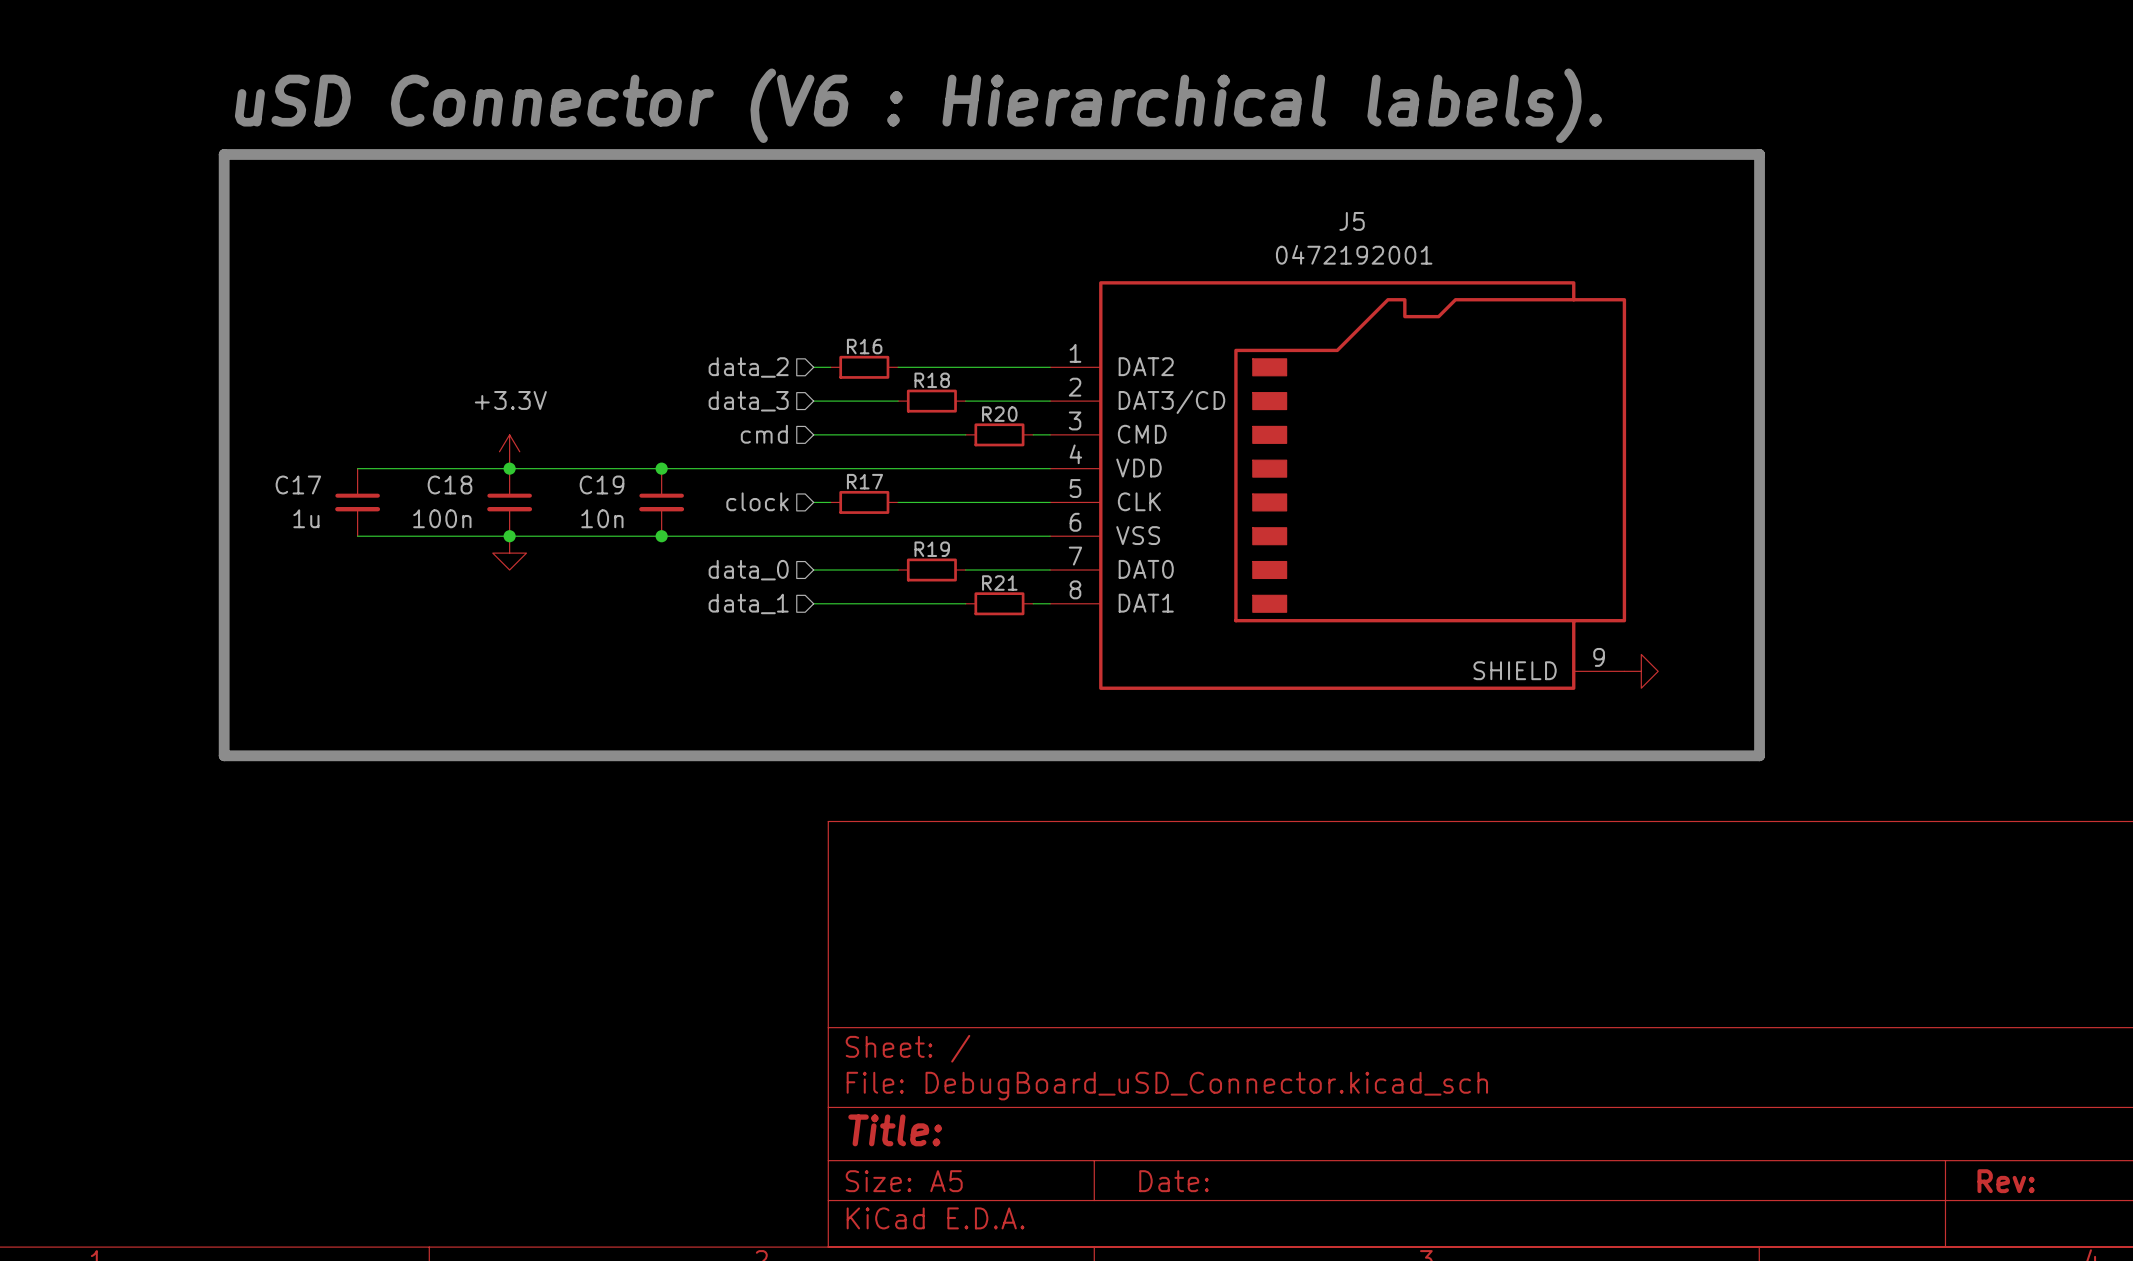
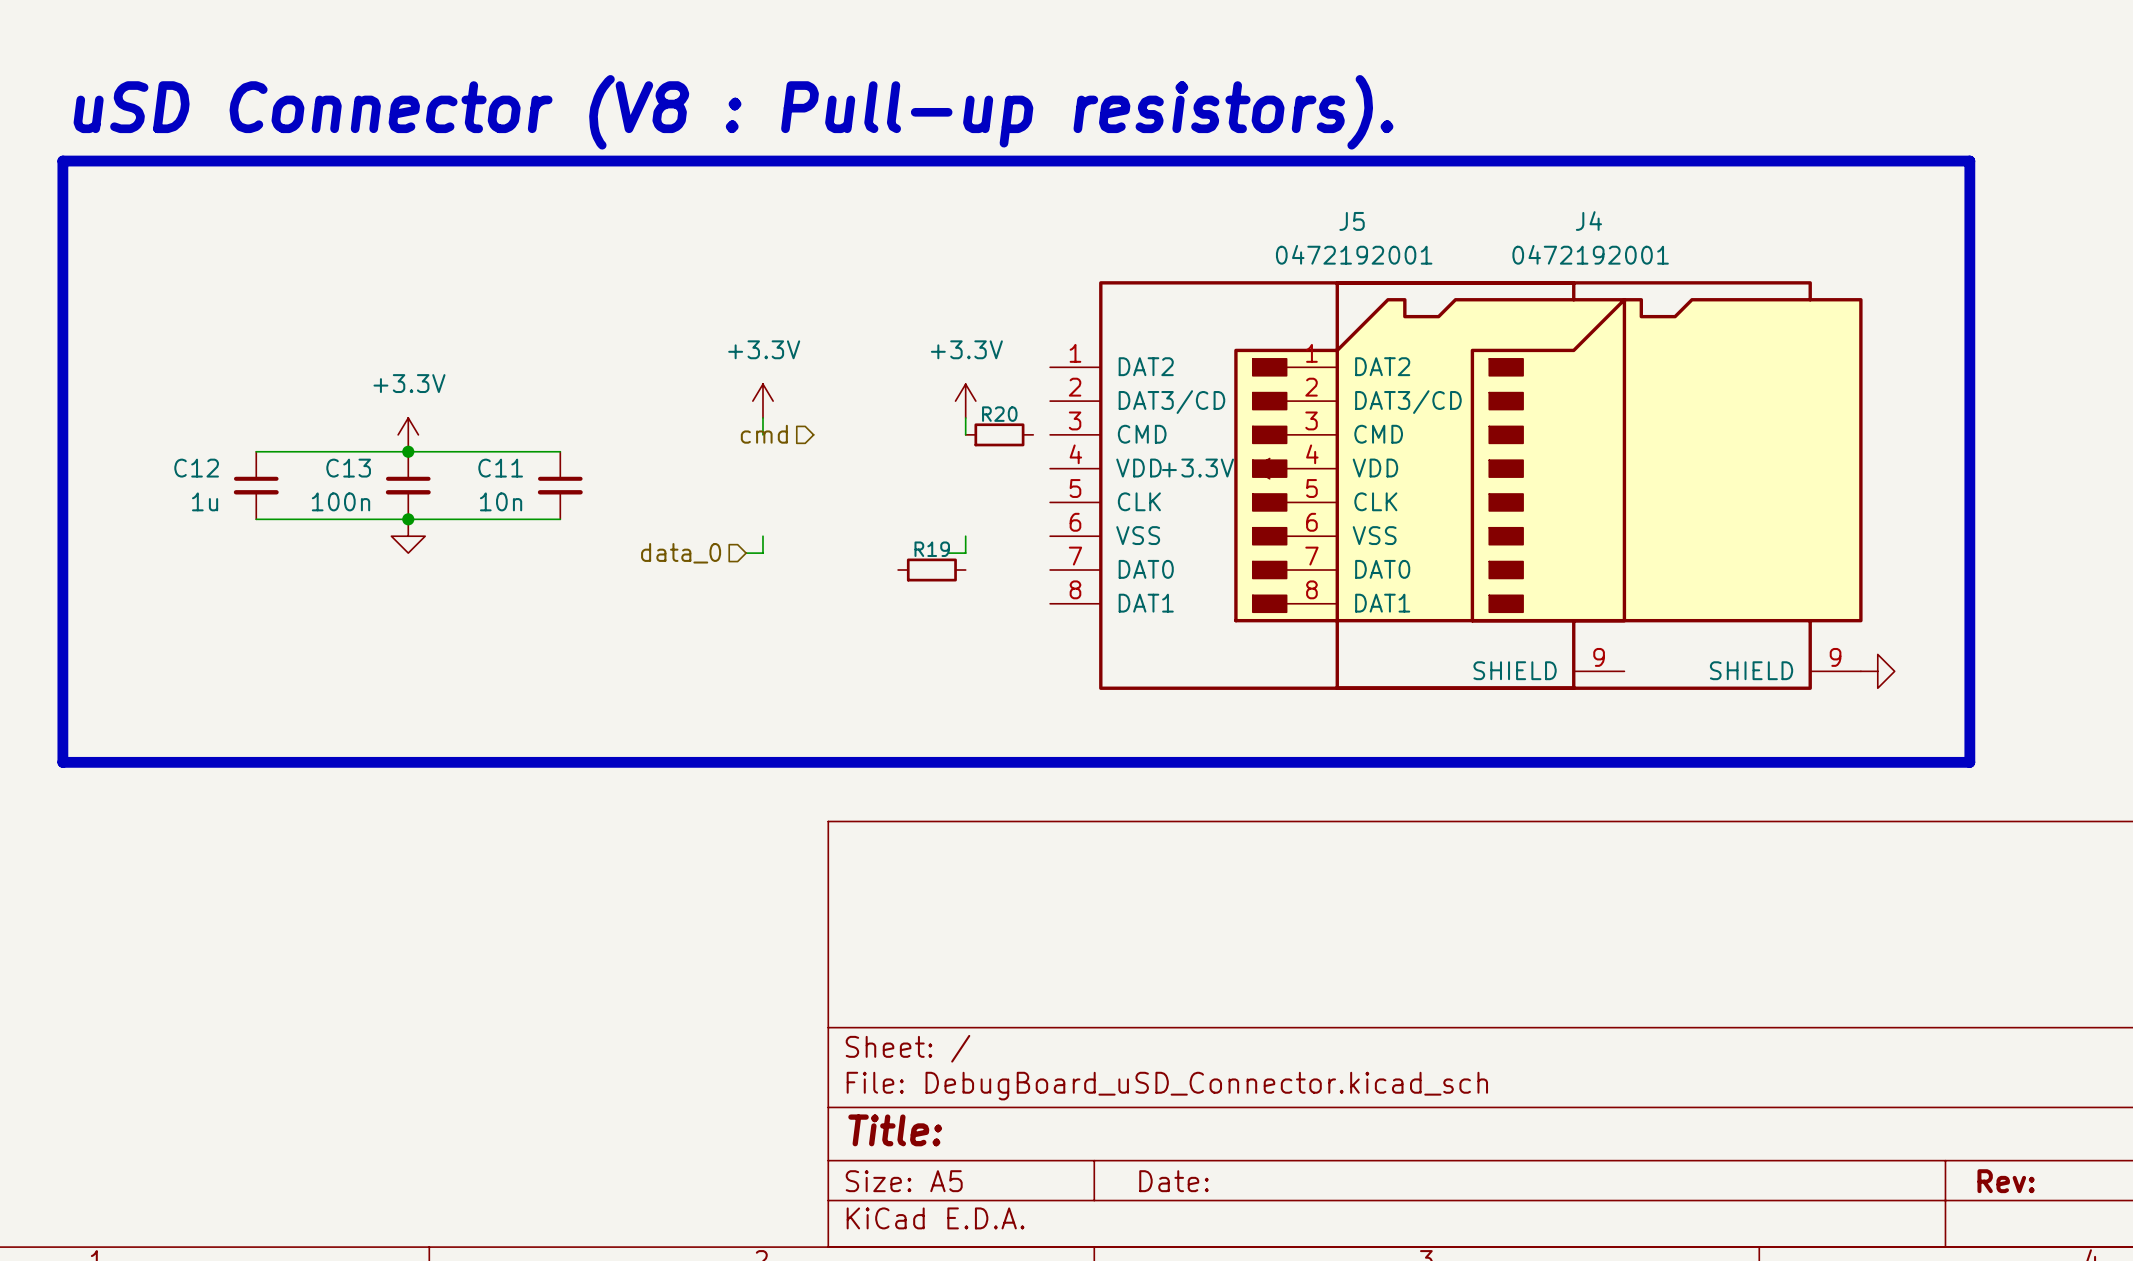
text: uSD Connector (V6 : Hierarchical labels). (918, 105) -> none
text: none -> uSD Connector (V8 : Pull-up resistors). (733, 112)
line: (224, 154) (1759, 154) (1759, 755) (224, 755) (224, 154) -> (62, 161) (62, 762) (1969, 762) (1969, 161) (62, 161)
hierarchical label: data_2 (748, 367) -> none
wire: (813, 367) (830, 367) -> none
R16: (864, 367) -> none
wire: (898, 367) (1050, 367) -> none
hierarchical label: data_3 (748, 401) -> none
power symbol: none -> +3.3V (762, 401)
wire: (813, 401) (898, 401) -> none
R18: (931, 401) -> none
wire: (965, 401) (1050, 401) -> none
power symbol: none -> +3.3V (965, 401)
wire: none -> (762, 417) (762, 434)
wire: (813, 434) (965, 434) -> (965, 417) (965, 434)
wire: (1033, 434) (1050, 434) -> none
wire: none -> (256, 451) (560, 451)
junction: none -> (408, 451)
power symbol position: +3.3V (509, 451) -> +3.3V (408, 434)
wire: (357, 468) (1050, 468) -> none
junction: (509, 468) -> none
junction: (661, 468) -> none
power symbol: none -> +3.3V (1269, 468)
C12: none -> 1u (256, 485)
C13: none -> 100n (408, 485)
C11: none -> 10n (560, 485)
J4: none -> 0472192001 (1574, 485)
hierarchical label: clock (757, 501) -> none
C17: 1u (357, 502) -> none
C18: 100n (509, 502) -> none
C19: 10n (661, 502) -> none
wire: (813, 502) (830, 502) -> none
R17: (864, 502) -> none
wire: (898, 502) (1050, 502) -> none
wire: none -> (256, 519) (560, 519)
junction: none -> (408, 519)
wire: (357, 536) (1050, 536) -> none
junction: (509, 536) -> none
junction: (661, 536) -> none
wire: none -> (762, 536) (762, 553) (746, 553)
wire: none -> (965, 536) (965, 553) (948, 553)
power symbol position: (509, 553) -> (408, 536)
hierarchical label position: data_0 (748, 570) -> data_0 (681, 553)
wire: (813, 570) (898, 570) -> none
wire: (965, 570) (1050, 570) -> none
hierarchical label: data_1 (748, 603) -> none
wire: (813, 603) (965, 603) -> none
R21: (999, 603) -> none
wire: (1033, 603) (1050, 603) -> none
power symbol position: (1641, 671) -> (1877, 671)

